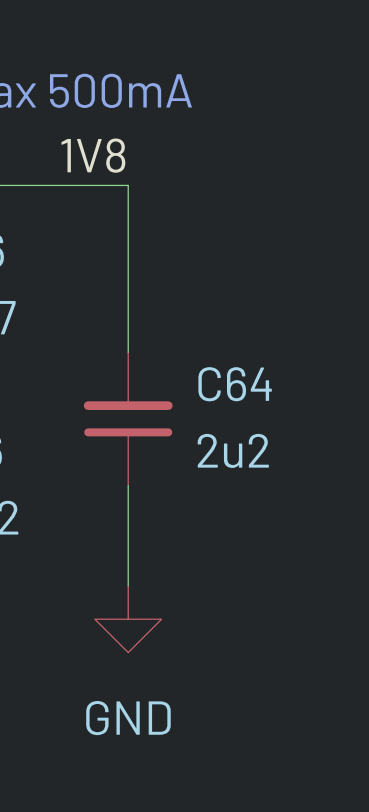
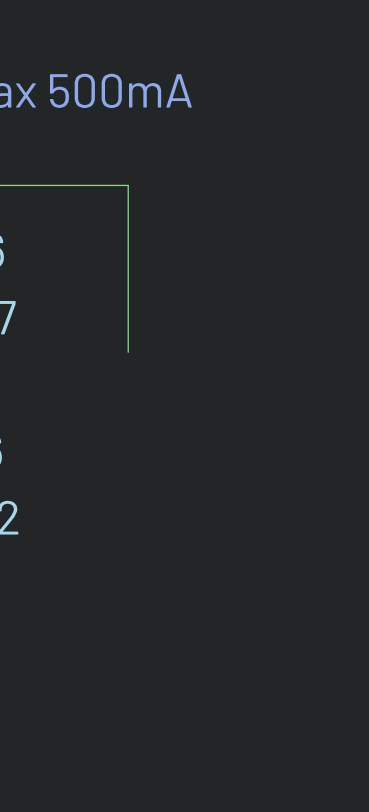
label: 1V8 (93, 155) -> none
C64: (128, 419) -> none
wire: (128, 485) (128, 585) -> none
power symbol: GND (128, 619) -> none

